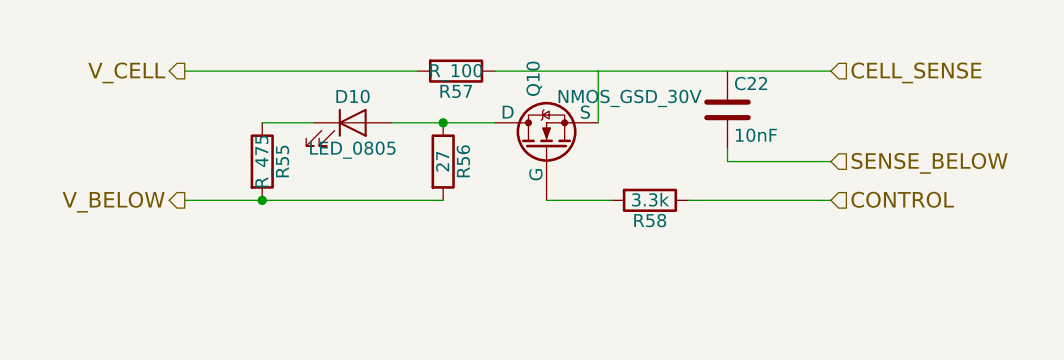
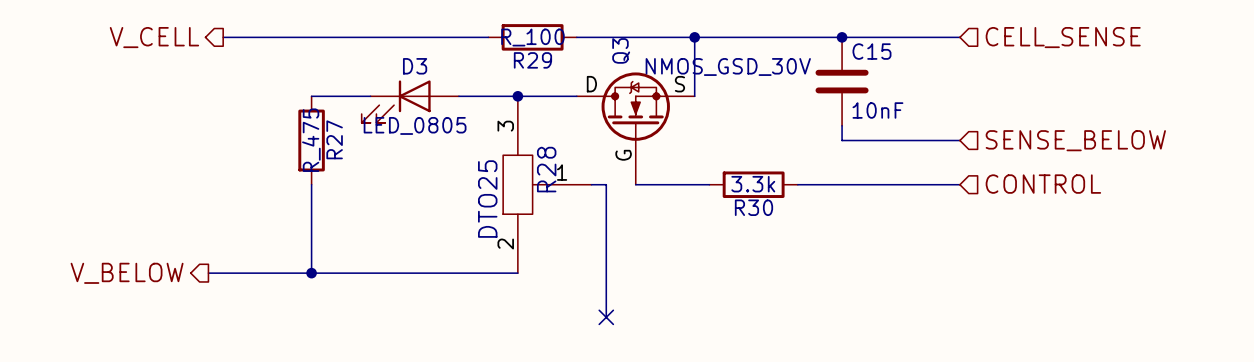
junction: none -> (694, 37)
junction: none -> (842, 37)
Q10 name: Q10 (534, 78) -> Q3 (621, 50)
C22 name: C22 (751, 83) -> C15 (871, 51)
R57 name: R57 (456, 91) -> R29 (532, 60)
D10 name: D10 (352, 96) -> D3 (415, 66)
R55 name: R55 (282, 161) -> R27 (334, 139)
R56: 27 (443, 161) -> none
wire: (184, 200) (443, 200) -> none
wire: none -> (311, 184) (311, 273)
junction: (262, 200) -> none
R28: none -> DTO25 (547, 184)
wire: none -> (591, 184) (606, 184) (606, 317)
hierarchical label position: V_BELOW (113, 202) -> V_BELOW (127, 273)
R58 name: R58 (650, 220) -> R30 (753, 207)
wire: none -> (208, 273) (517, 273)
junction: none -> (311, 273)
no-connect mark: none -> (606, 317)

